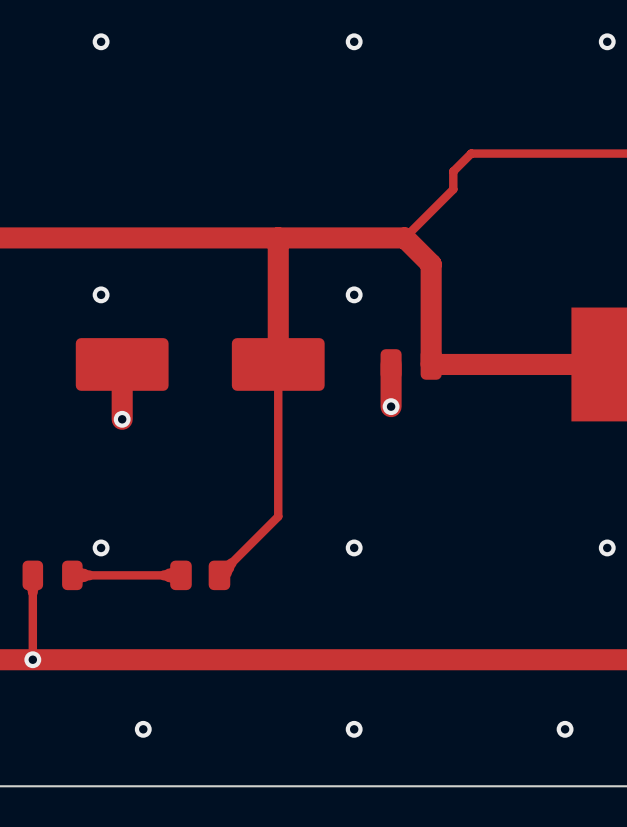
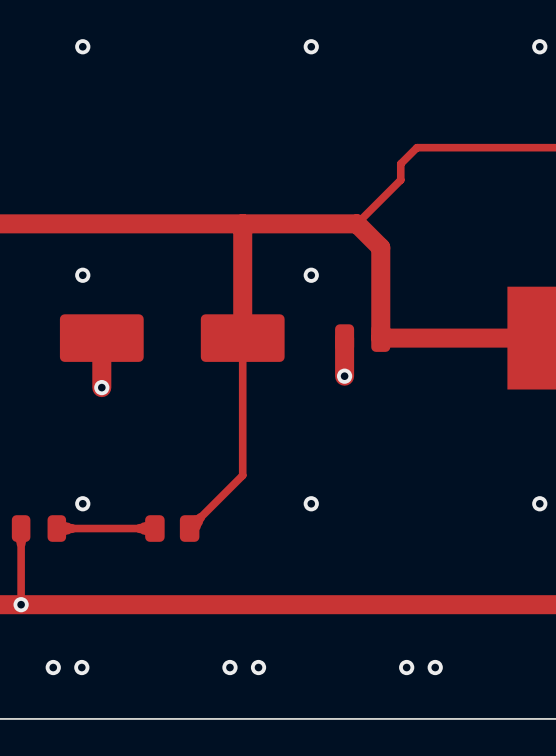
via: none -> (53, 667)
via: none -> (81, 667)
via: (143, 729) -> none
via: none -> (229, 667)
via: none -> (258, 667)
via: (354, 729) -> none
via: none -> (406, 667)
via: none -> (435, 667)
via: (565, 729) -> none

